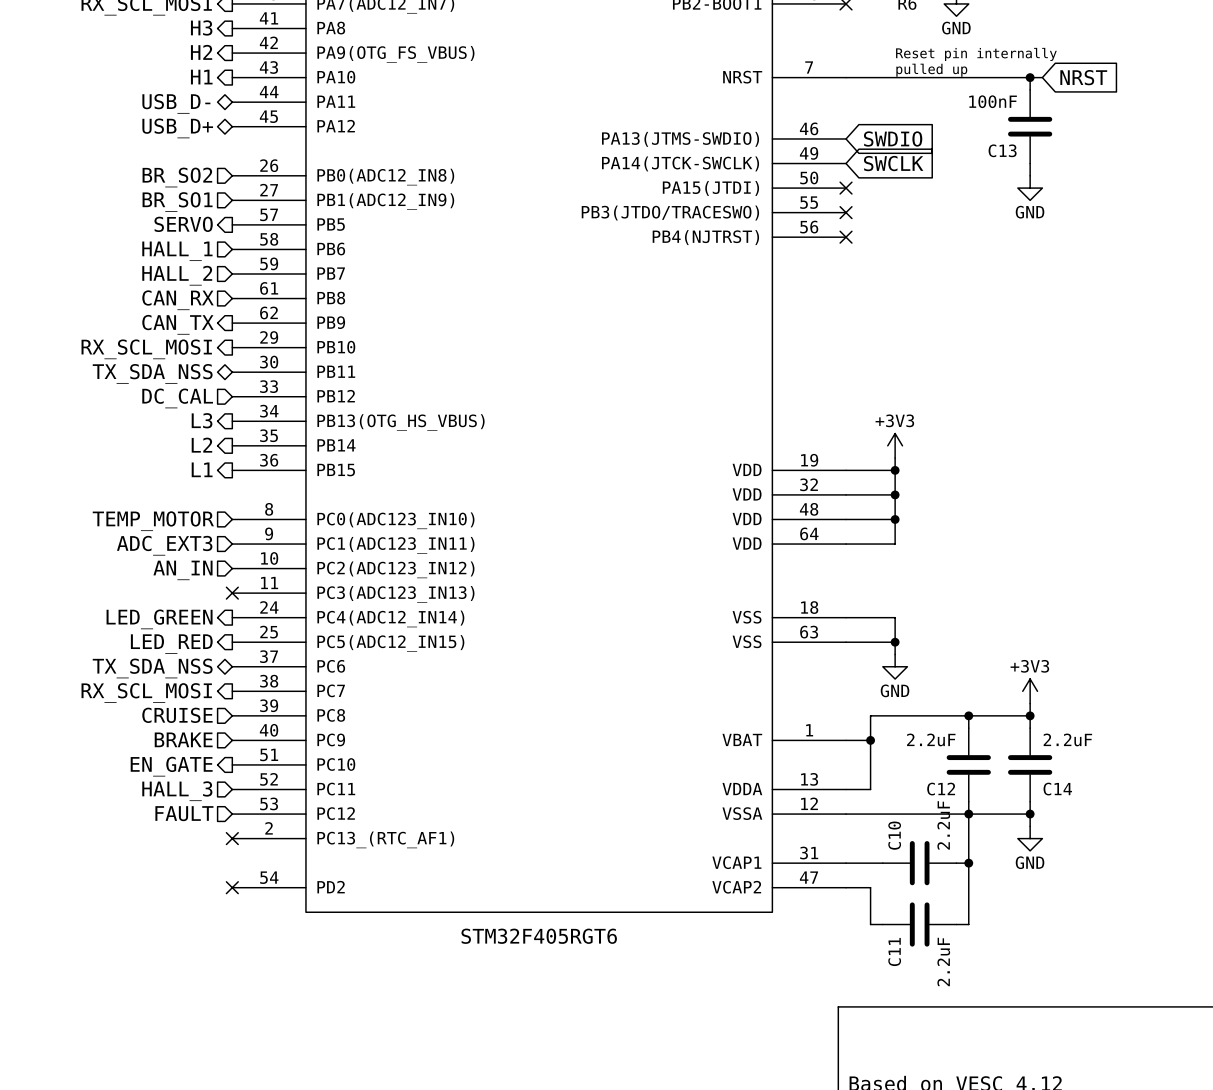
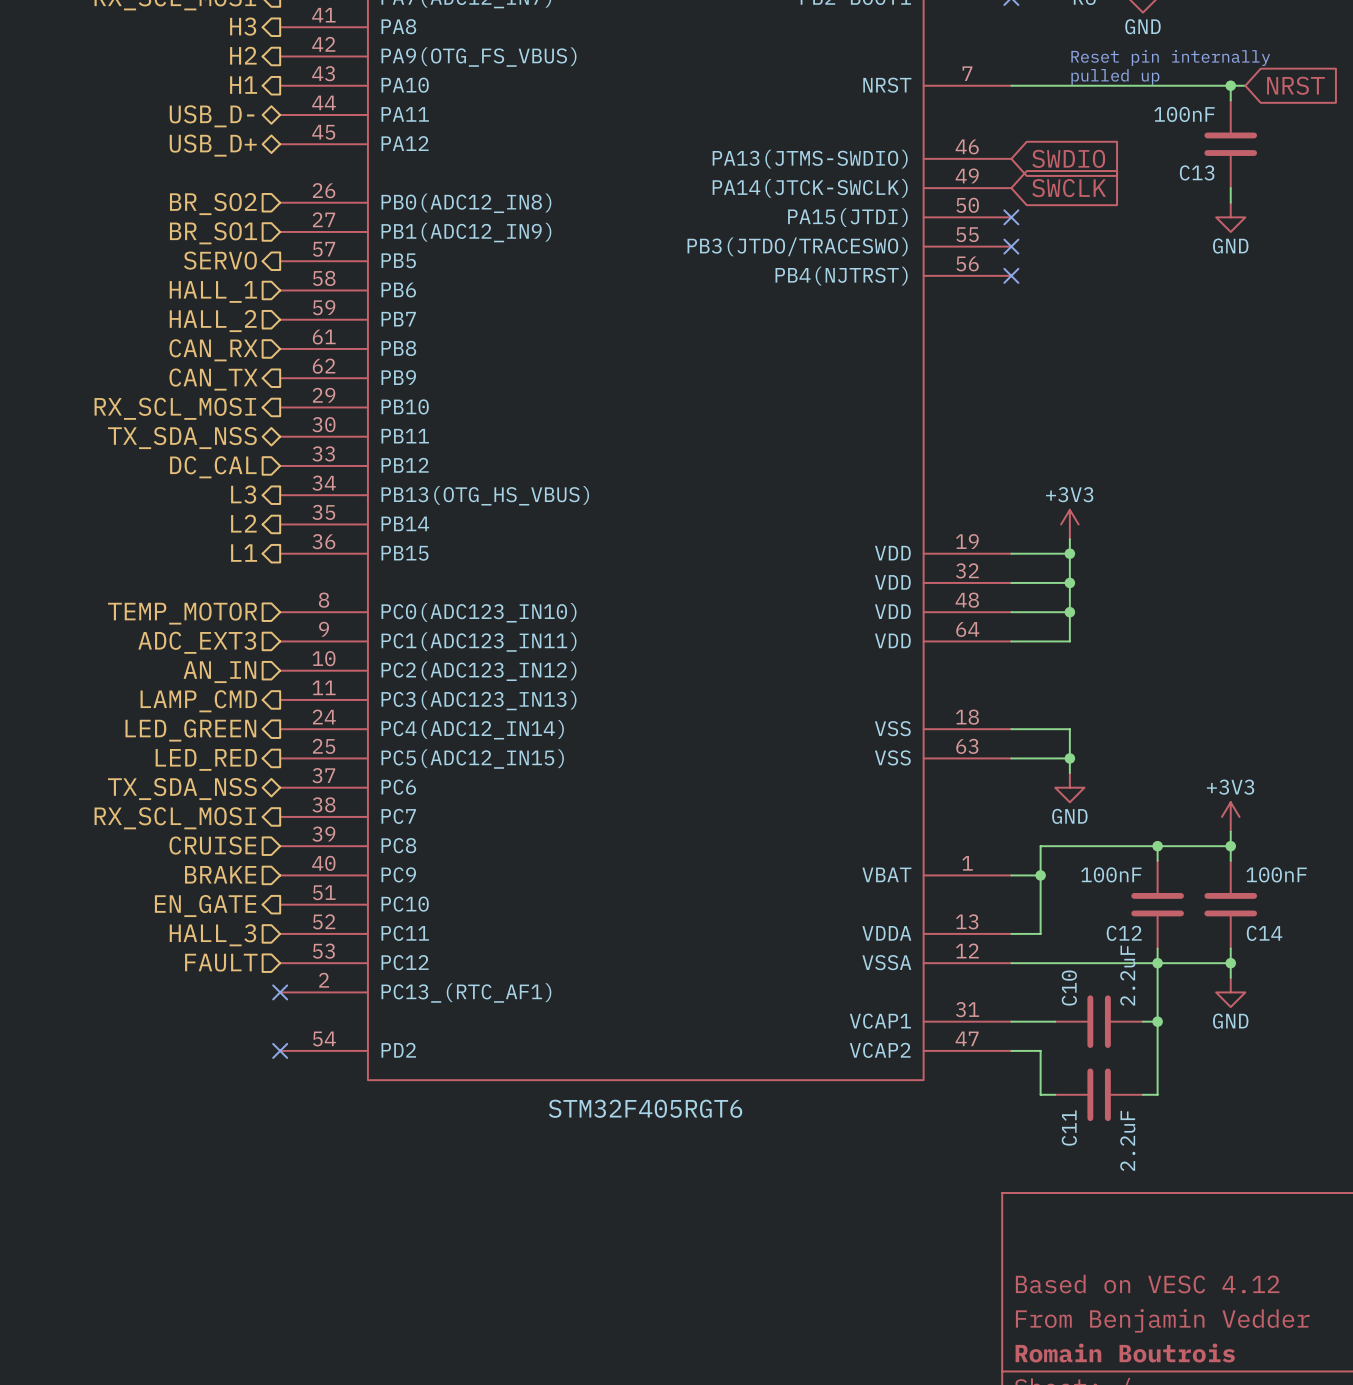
no-connect mark: (232, 593) -> none
hierarchical label: none -> LAMP_CMD (198, 701)
C12 value: 2.2uF (931, 739) -> 100nF (1111, 874)
C14 value: 2.2uF (1067, 739) -> 100nF (1276, 874)

